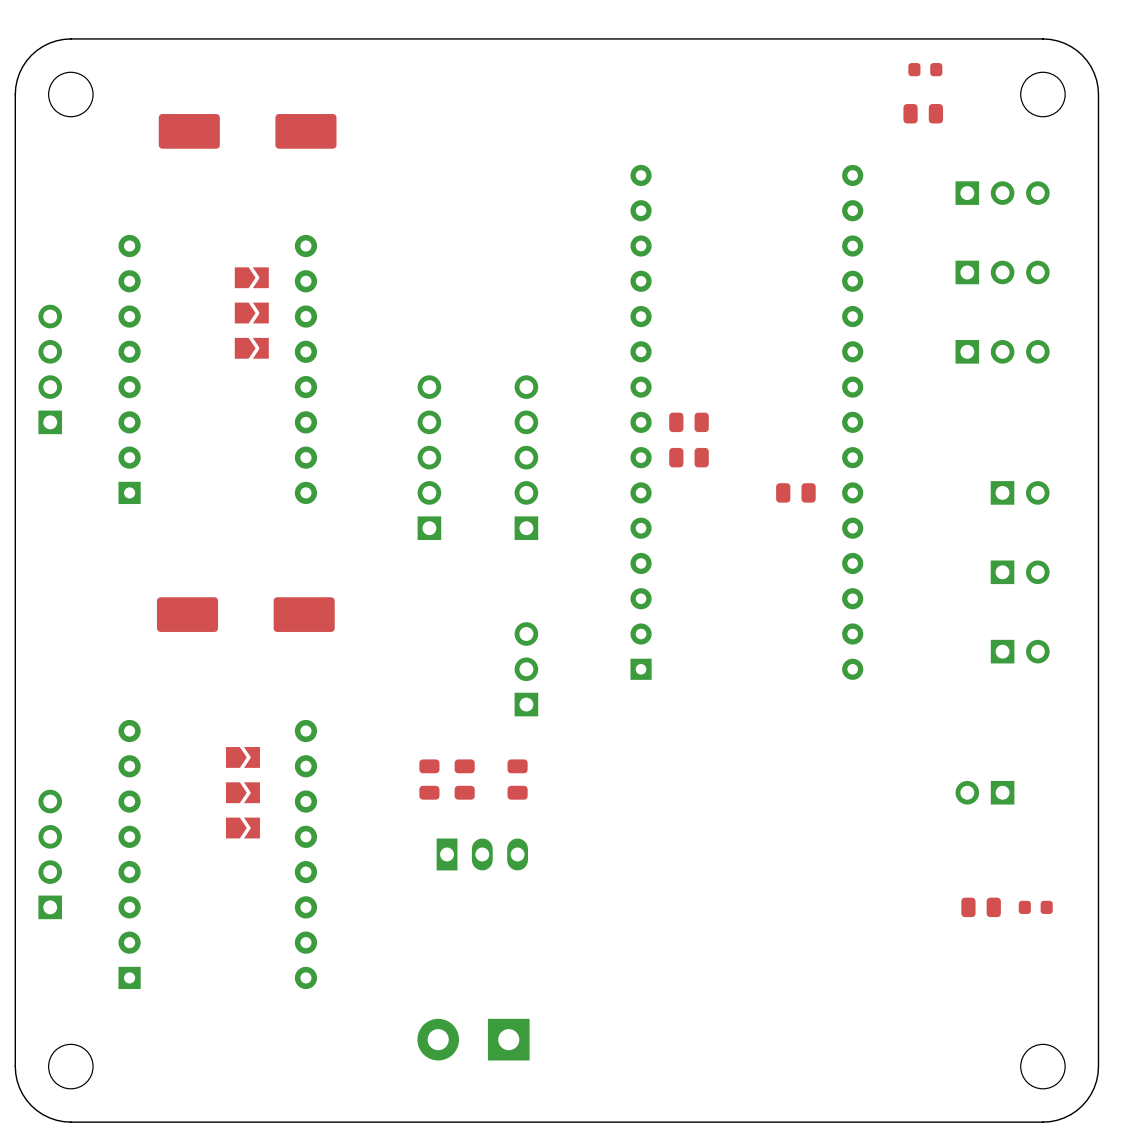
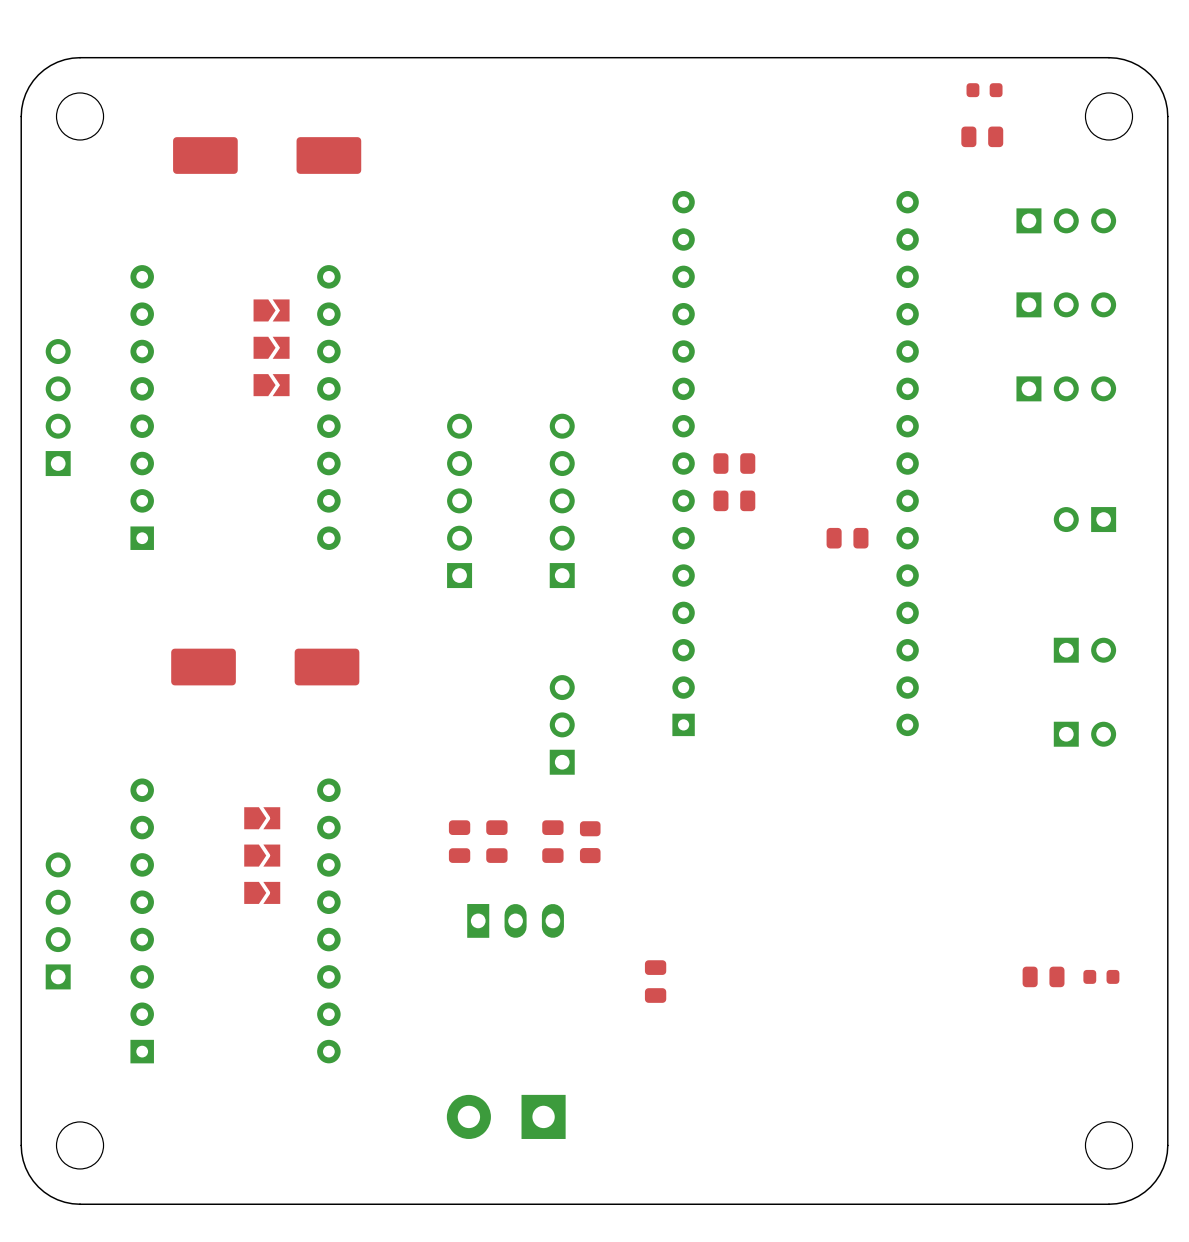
part rotation: 0° (1020, 492) -> 180° (1084, 519)
part: (1020, 572) -> none
part: none -> (1084, 650)
part: (1020, 651) -> none
part: none -> (1084, 734)
part: none -> (590, 842)
part: (984, 792) -> none
part: none -> (655, 981)

